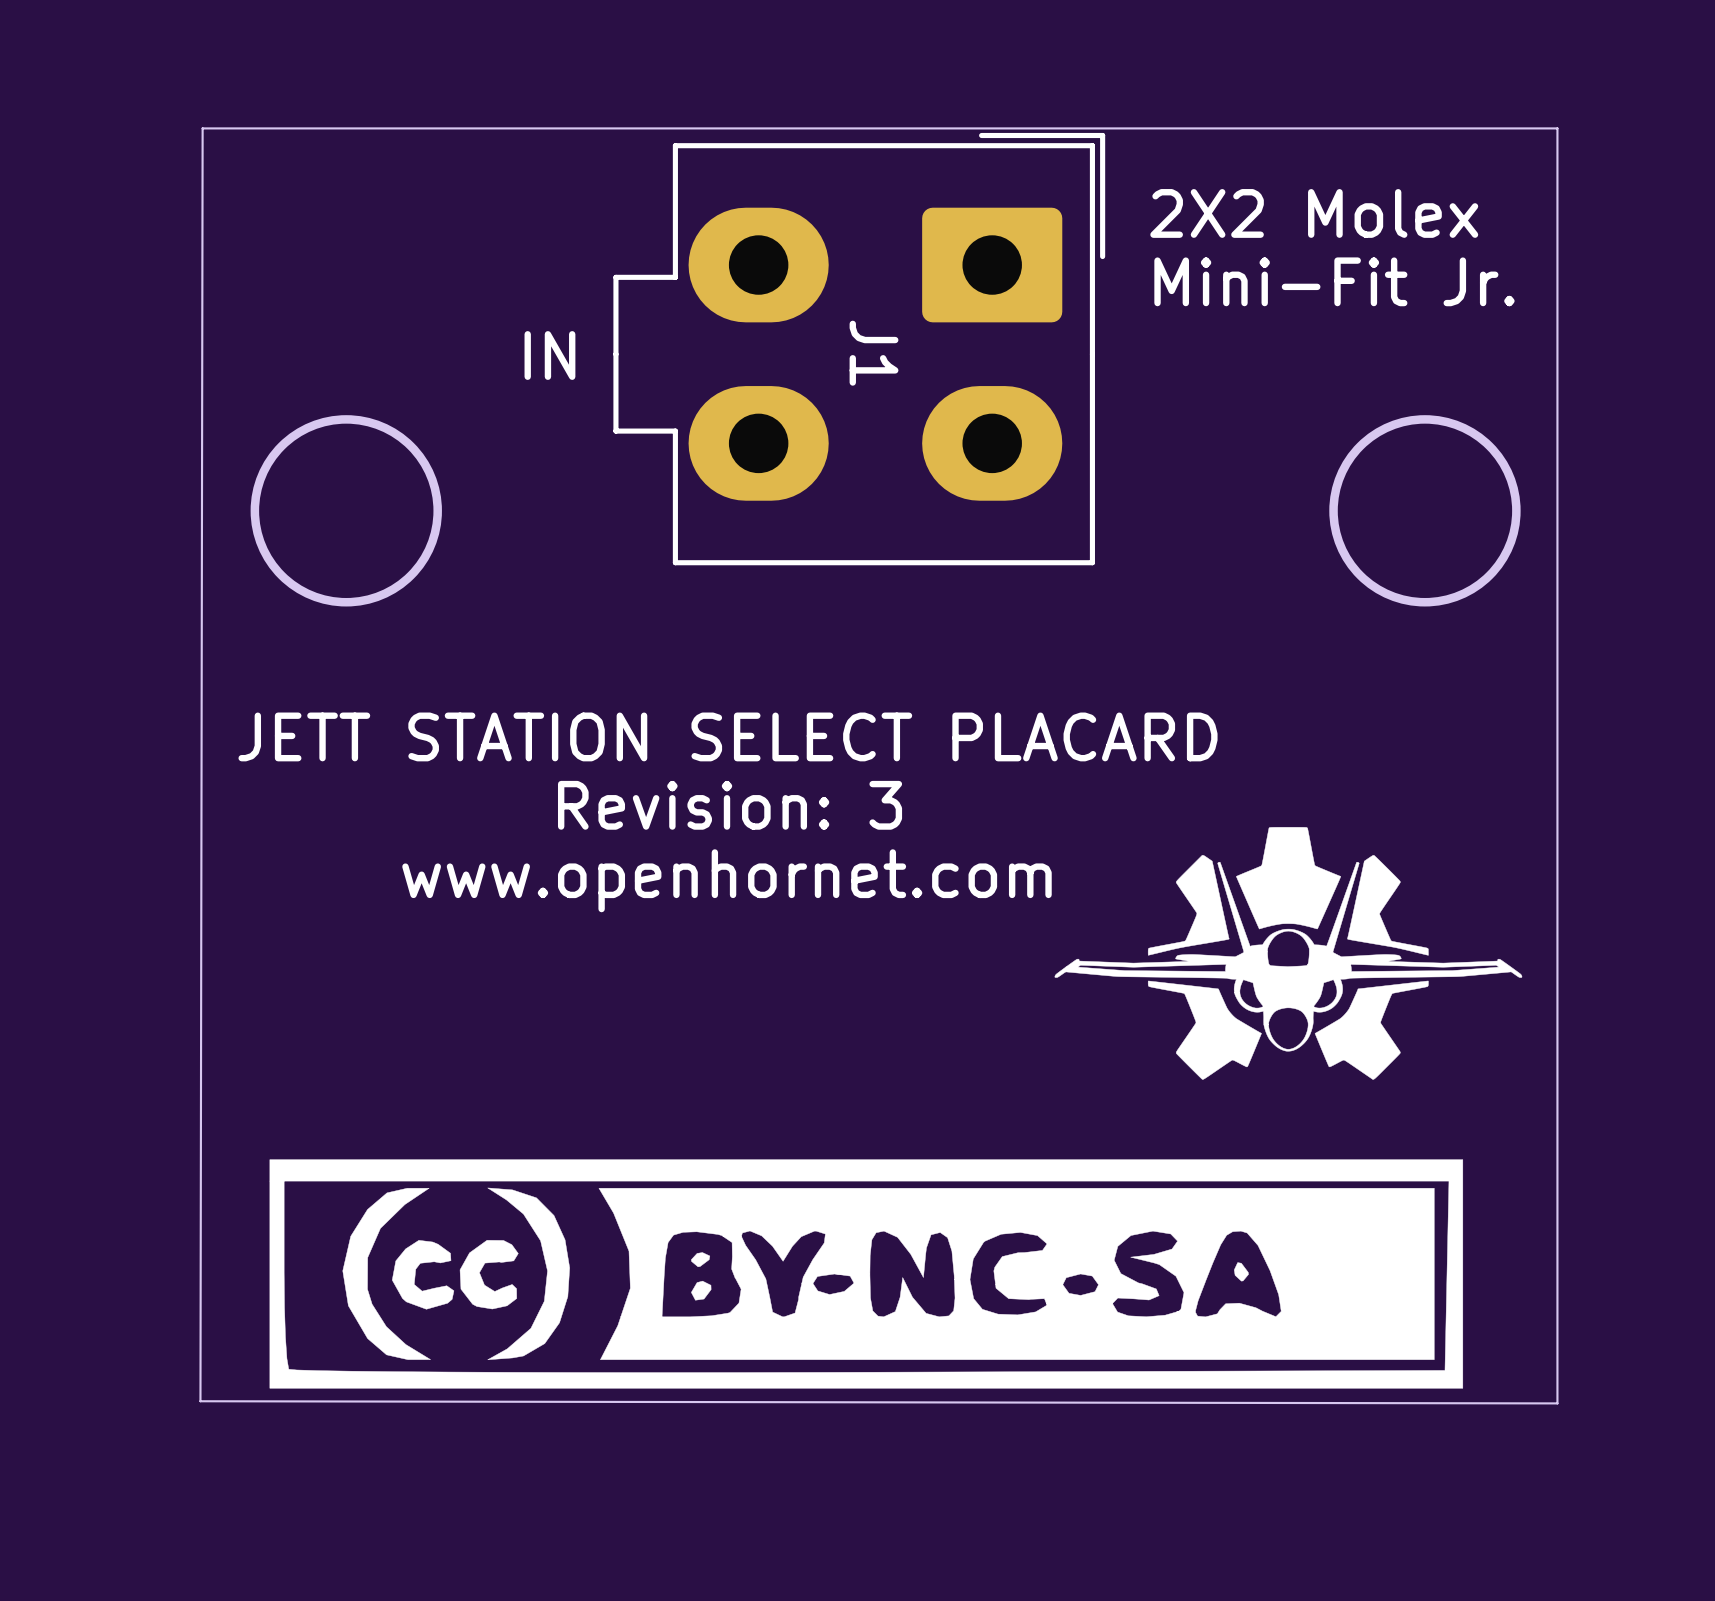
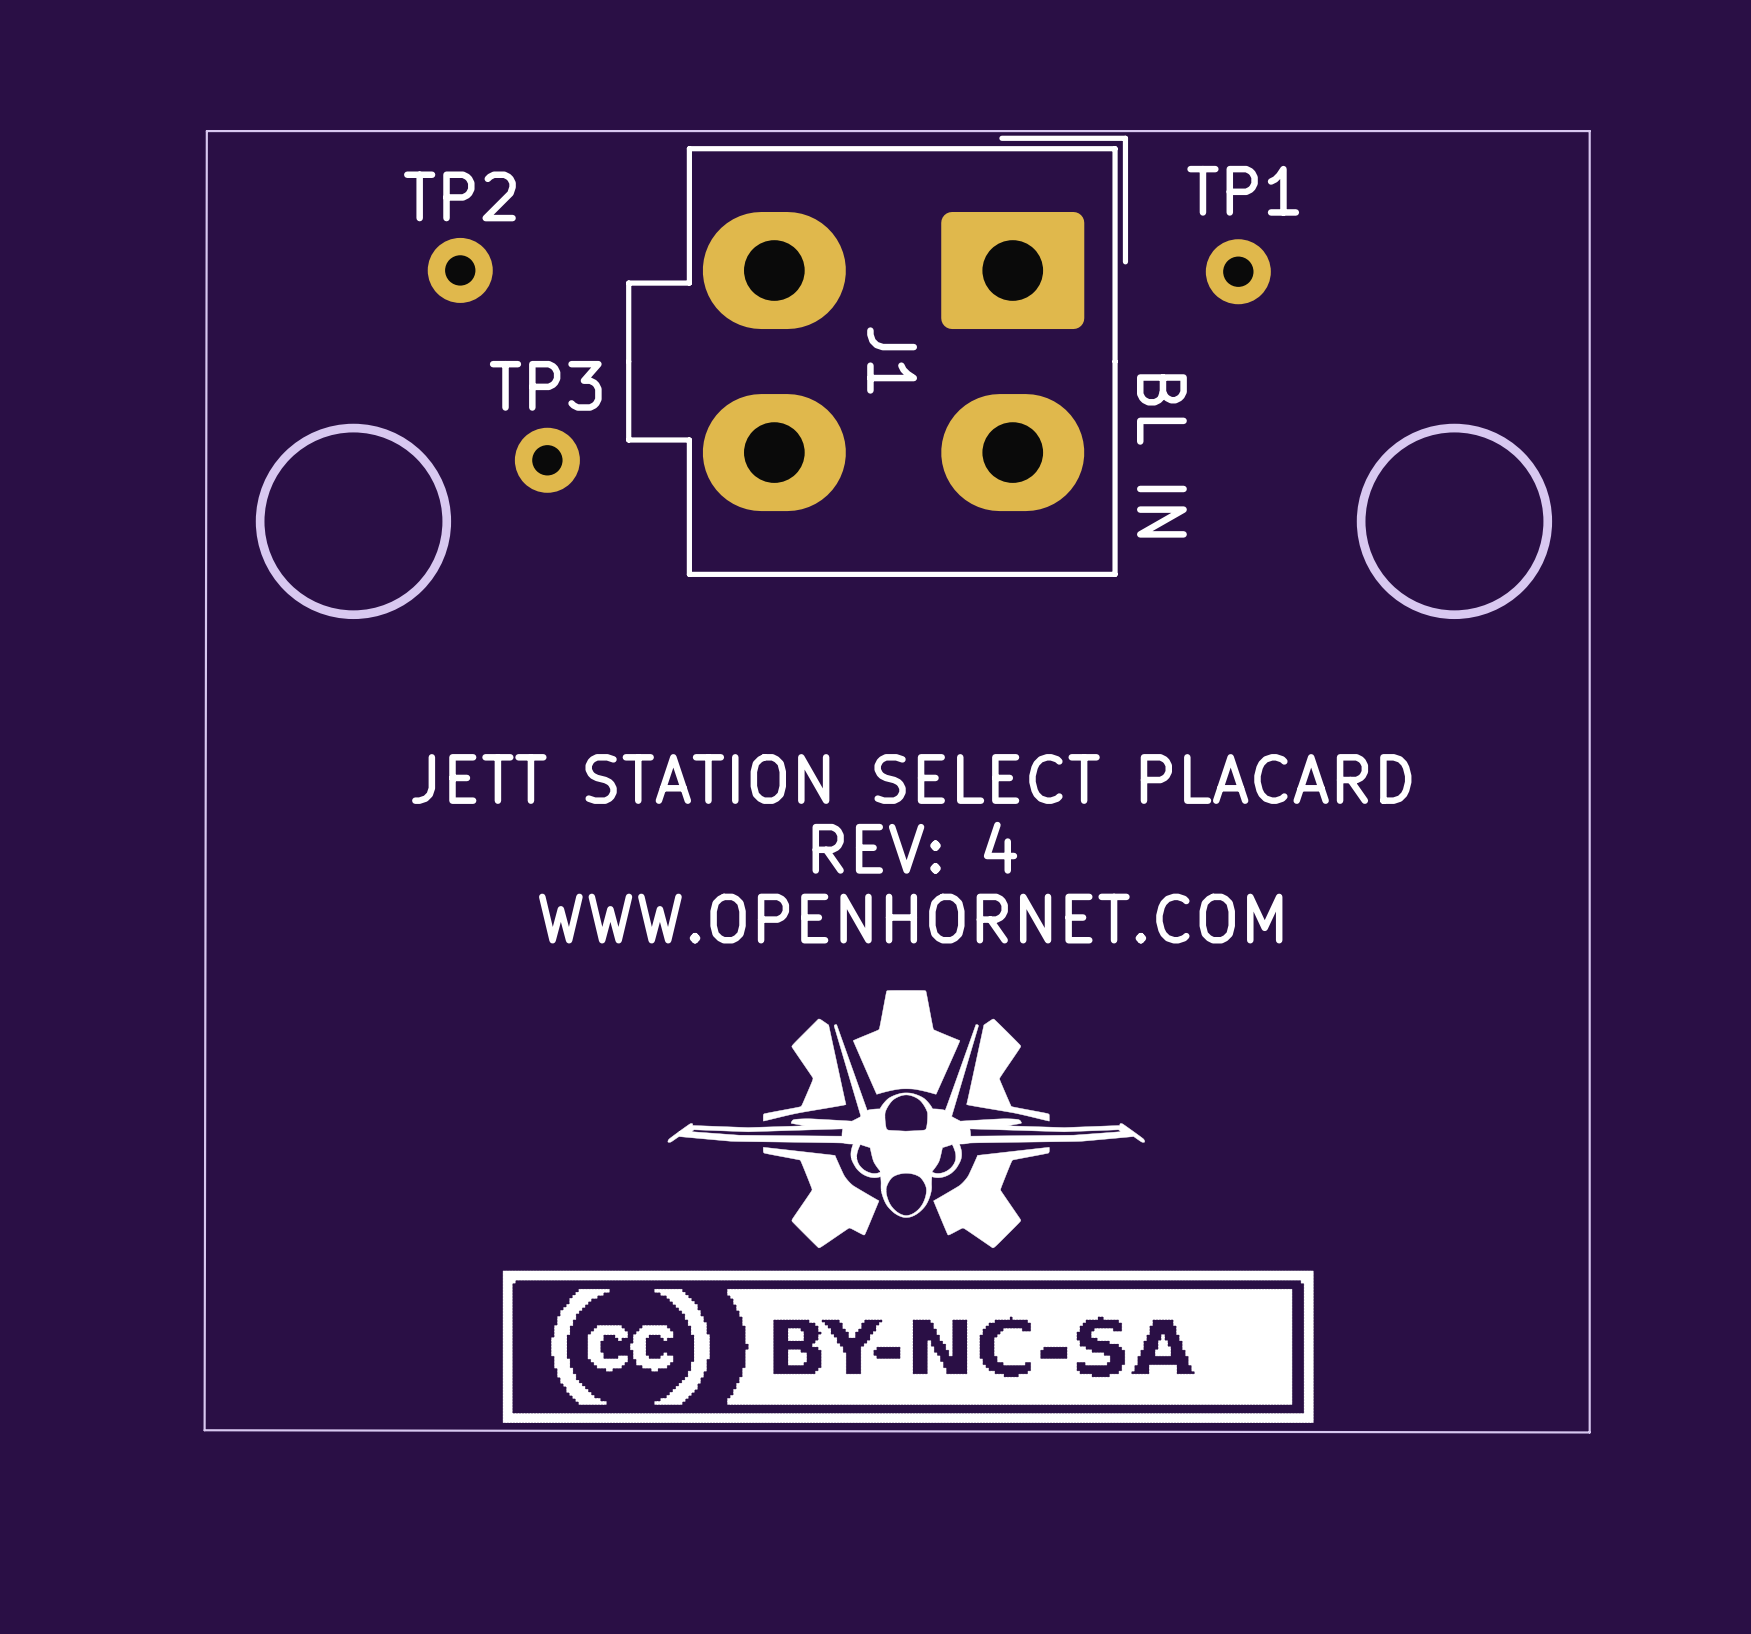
text: 2X2 Molex (1314, 213) -> none
part: none -> (460, 270)
part: none -> (1238, 271)
text: Mini-Fit Jr. (1334, 281) -> none
text: IN (549, 355) -> none
J1 text: none -> BL IN (1161, 455)
part: none -> (547, 460)
text position: JETT STATION SELECT PLACARD (728, 736) -> JETT STATION SELECT PLACARD (911, 778)
text: Revision: 3 (730, 805) -> none
text: none -> REV: 4 (914, 847)
text: www.openhornet.com (726, 880) -> none
text: none -> WWW.OPENHORNET.COM (910, 918)
drawing position: (1288, 953) -> (906, 1119)
drawing: [269, 1159, 1464, 1389] -> none
drawing: none -> [502, 1270, 1314, 1423]

